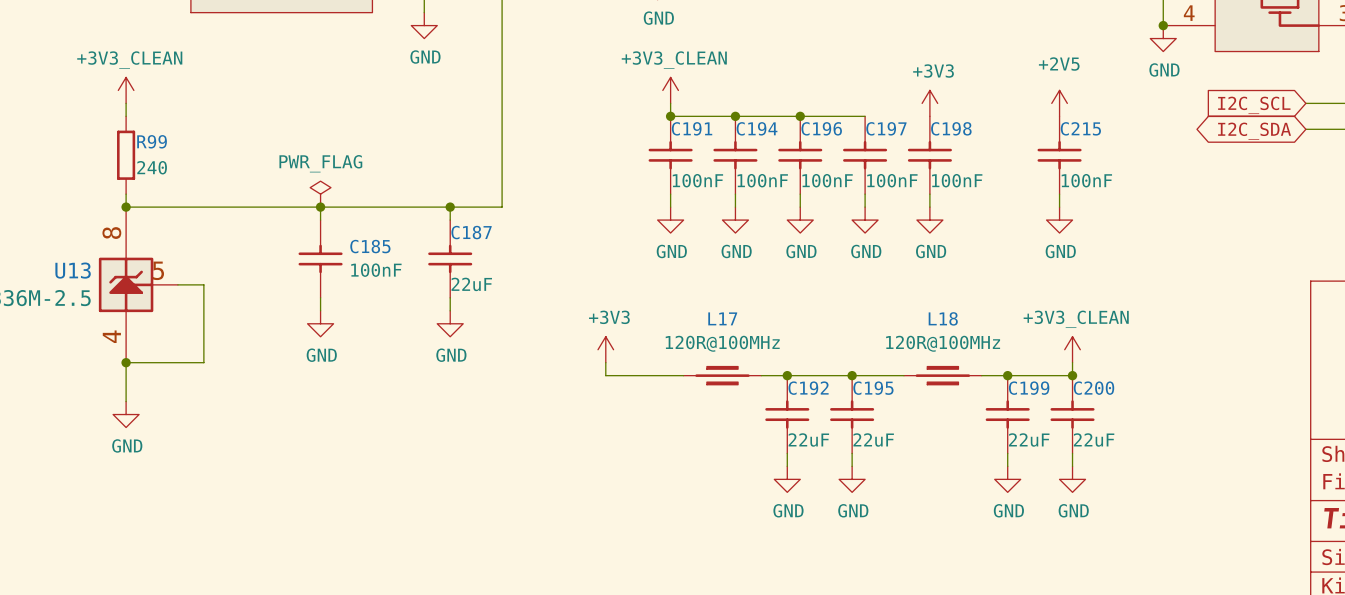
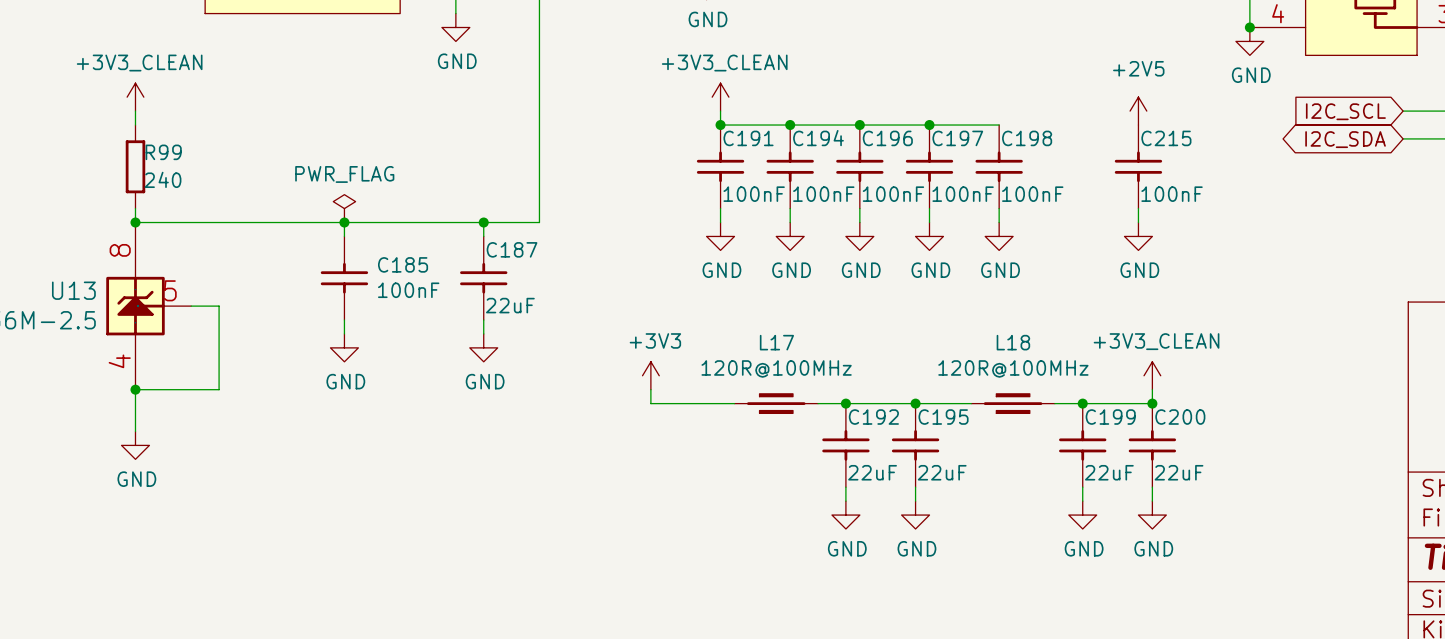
power symbol: +3V3 (929, 103) -> none
wire: none -> (929, 125) (999, 125)
junction: none -> (929, 125)

